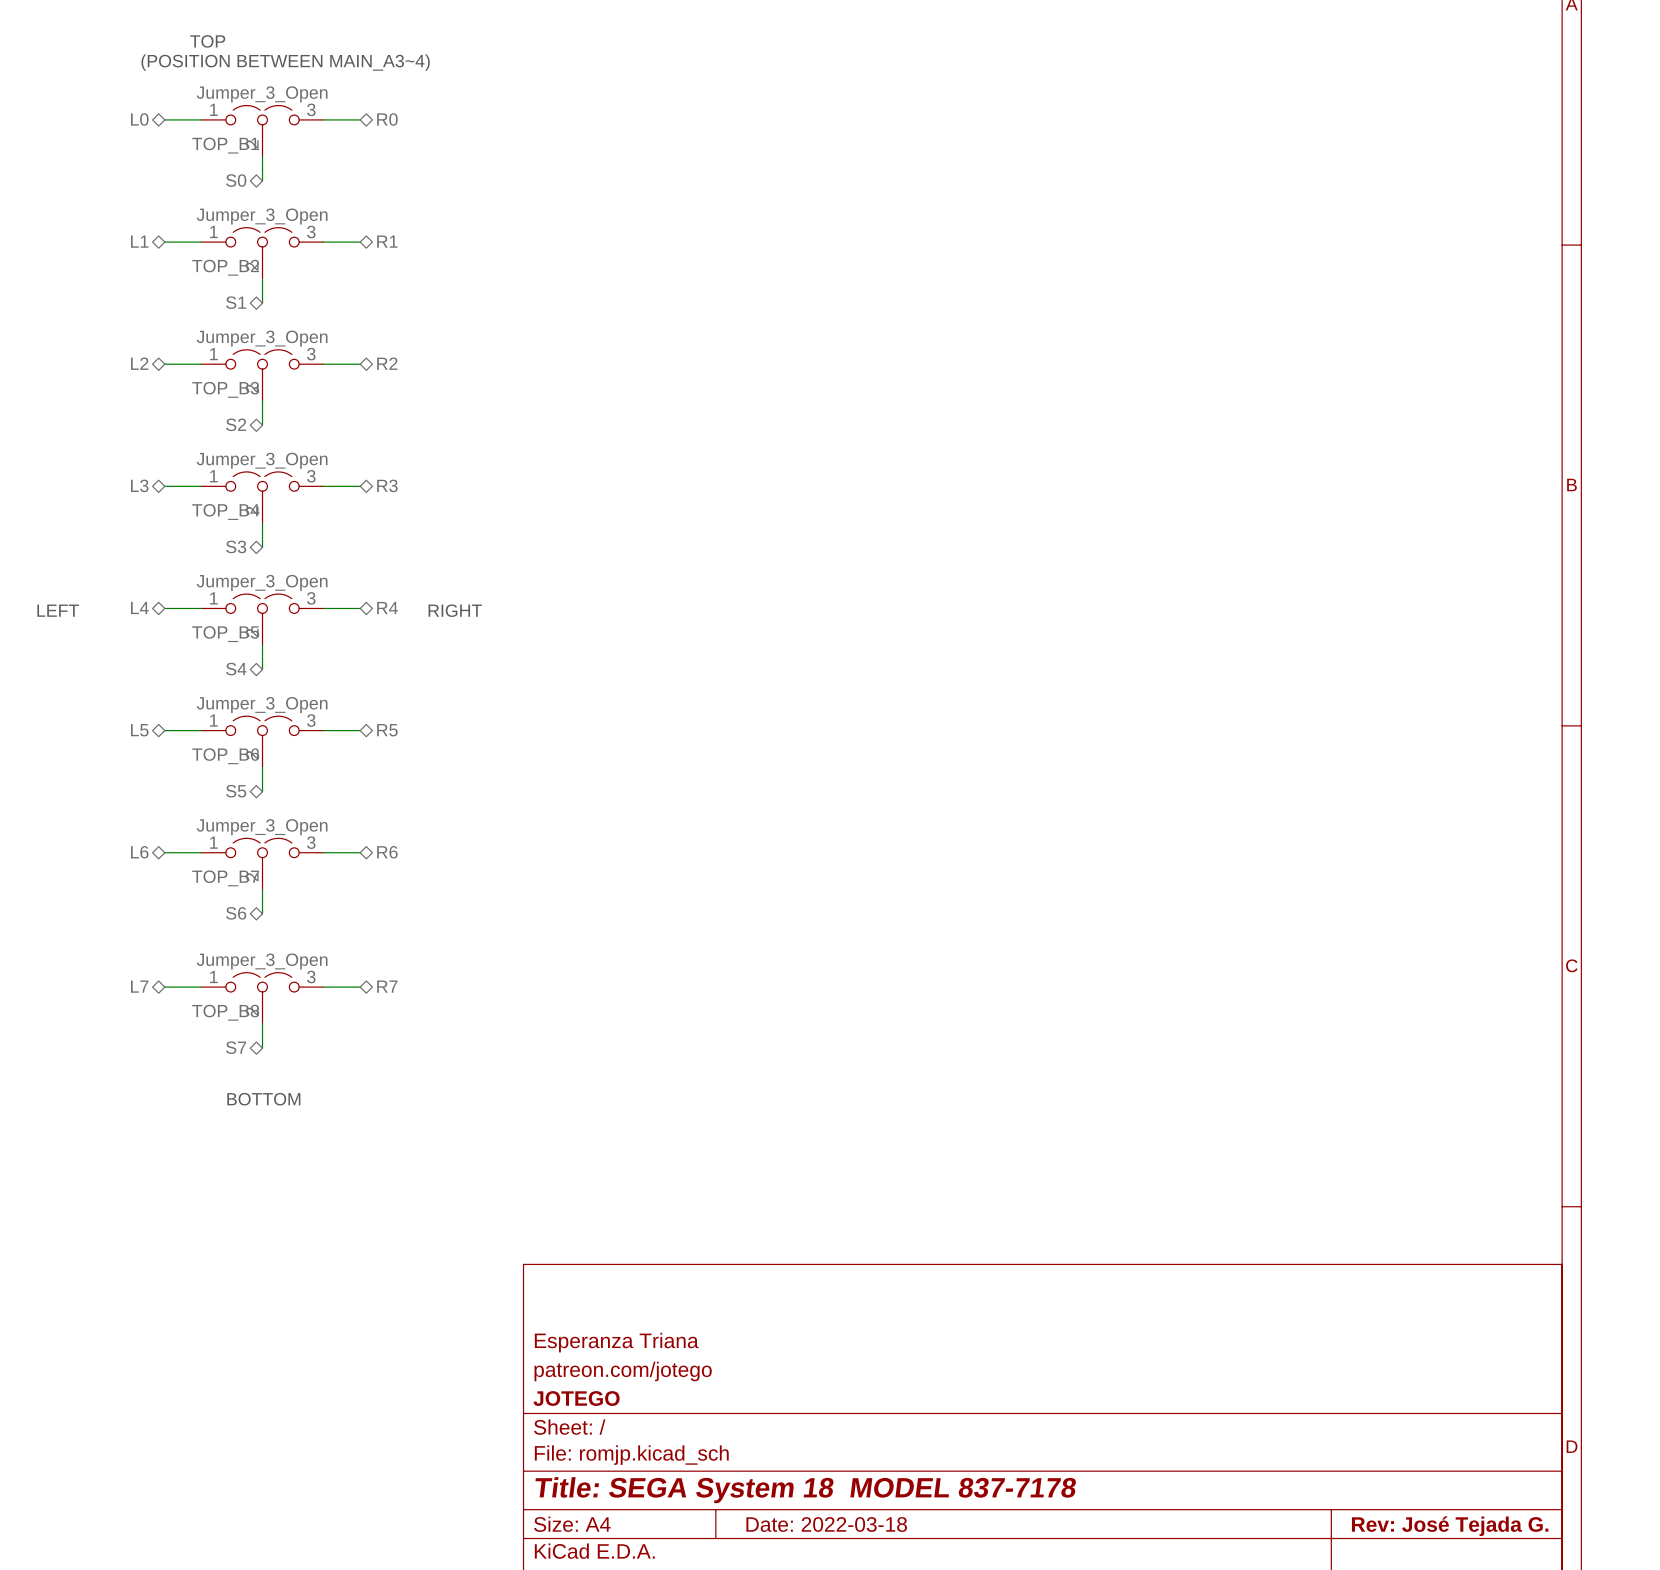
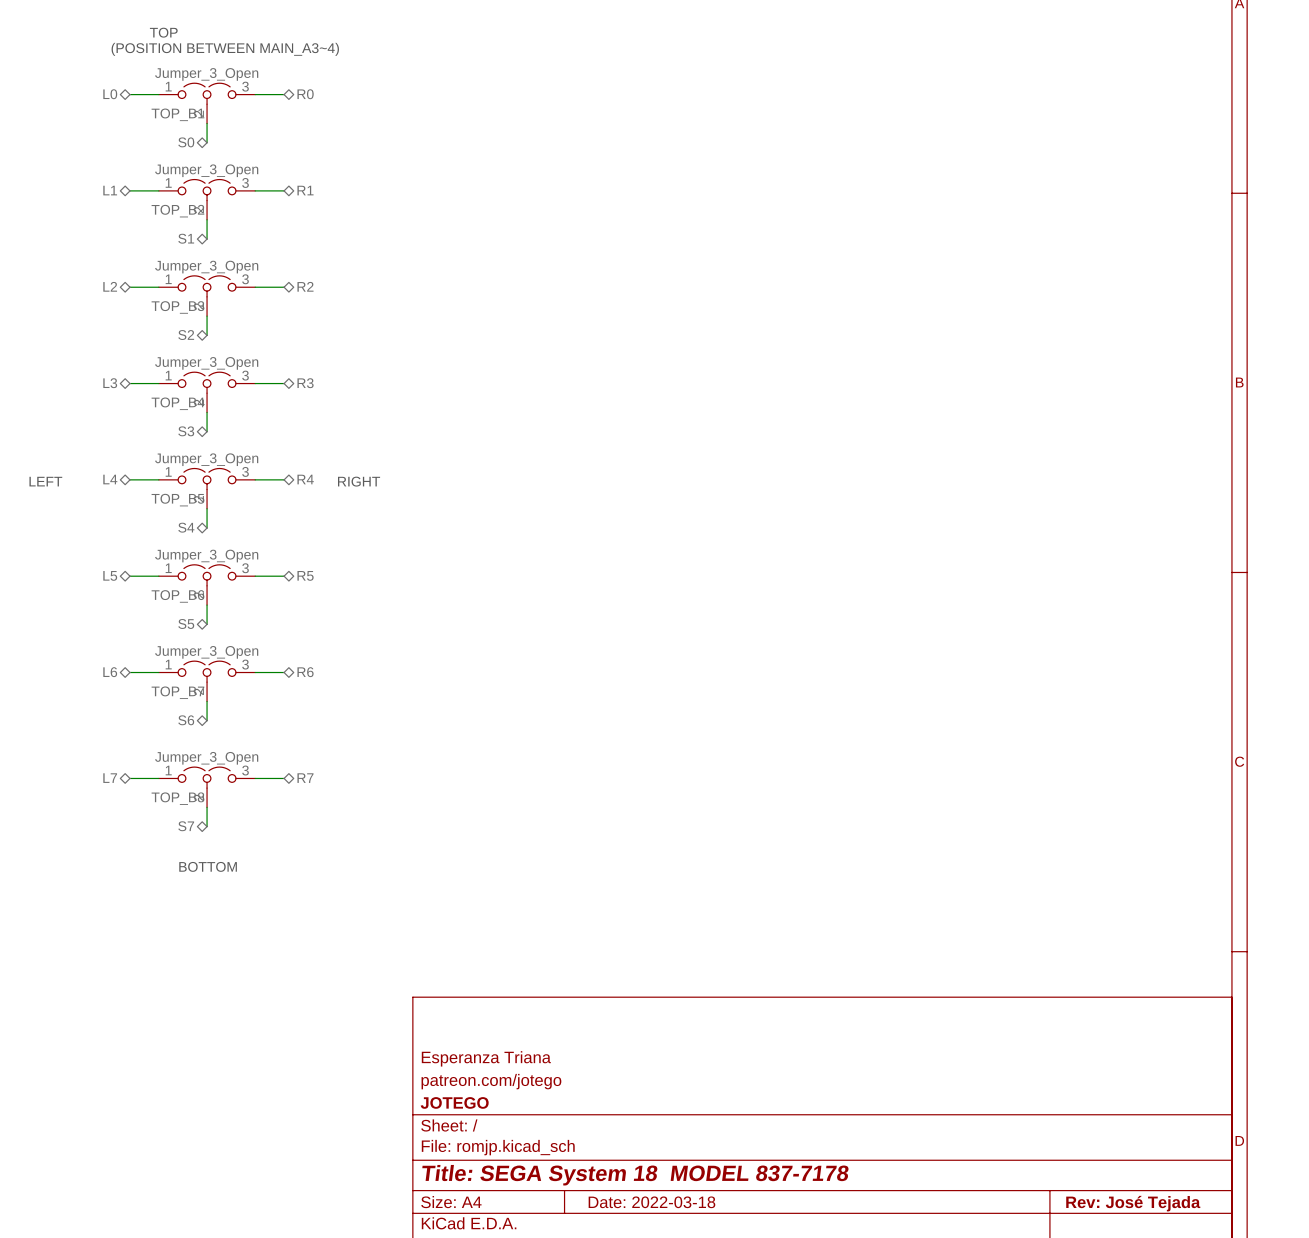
title block: Rev: José Tejada G. (1450, 1526) -> Rev: José Tejada (1133, 1203)

